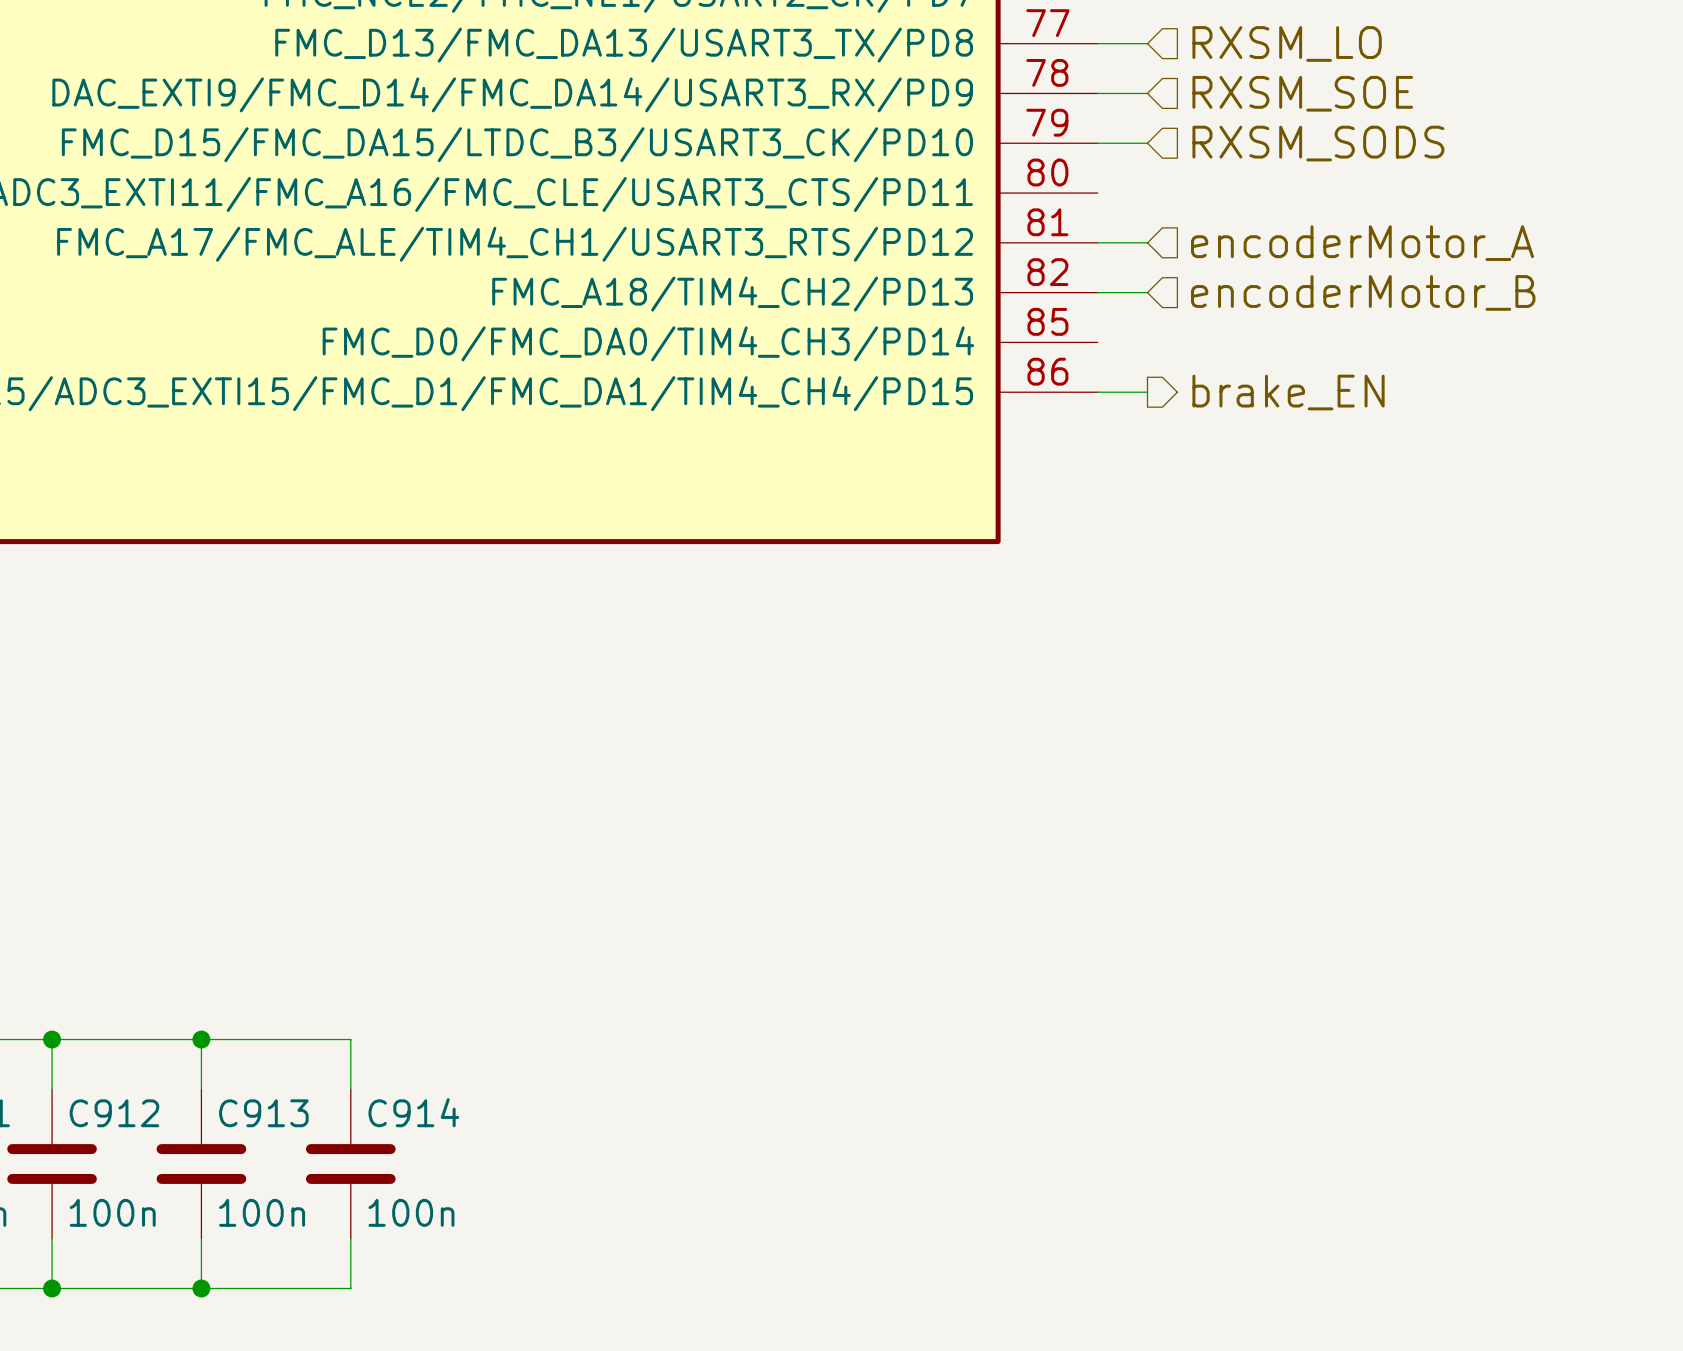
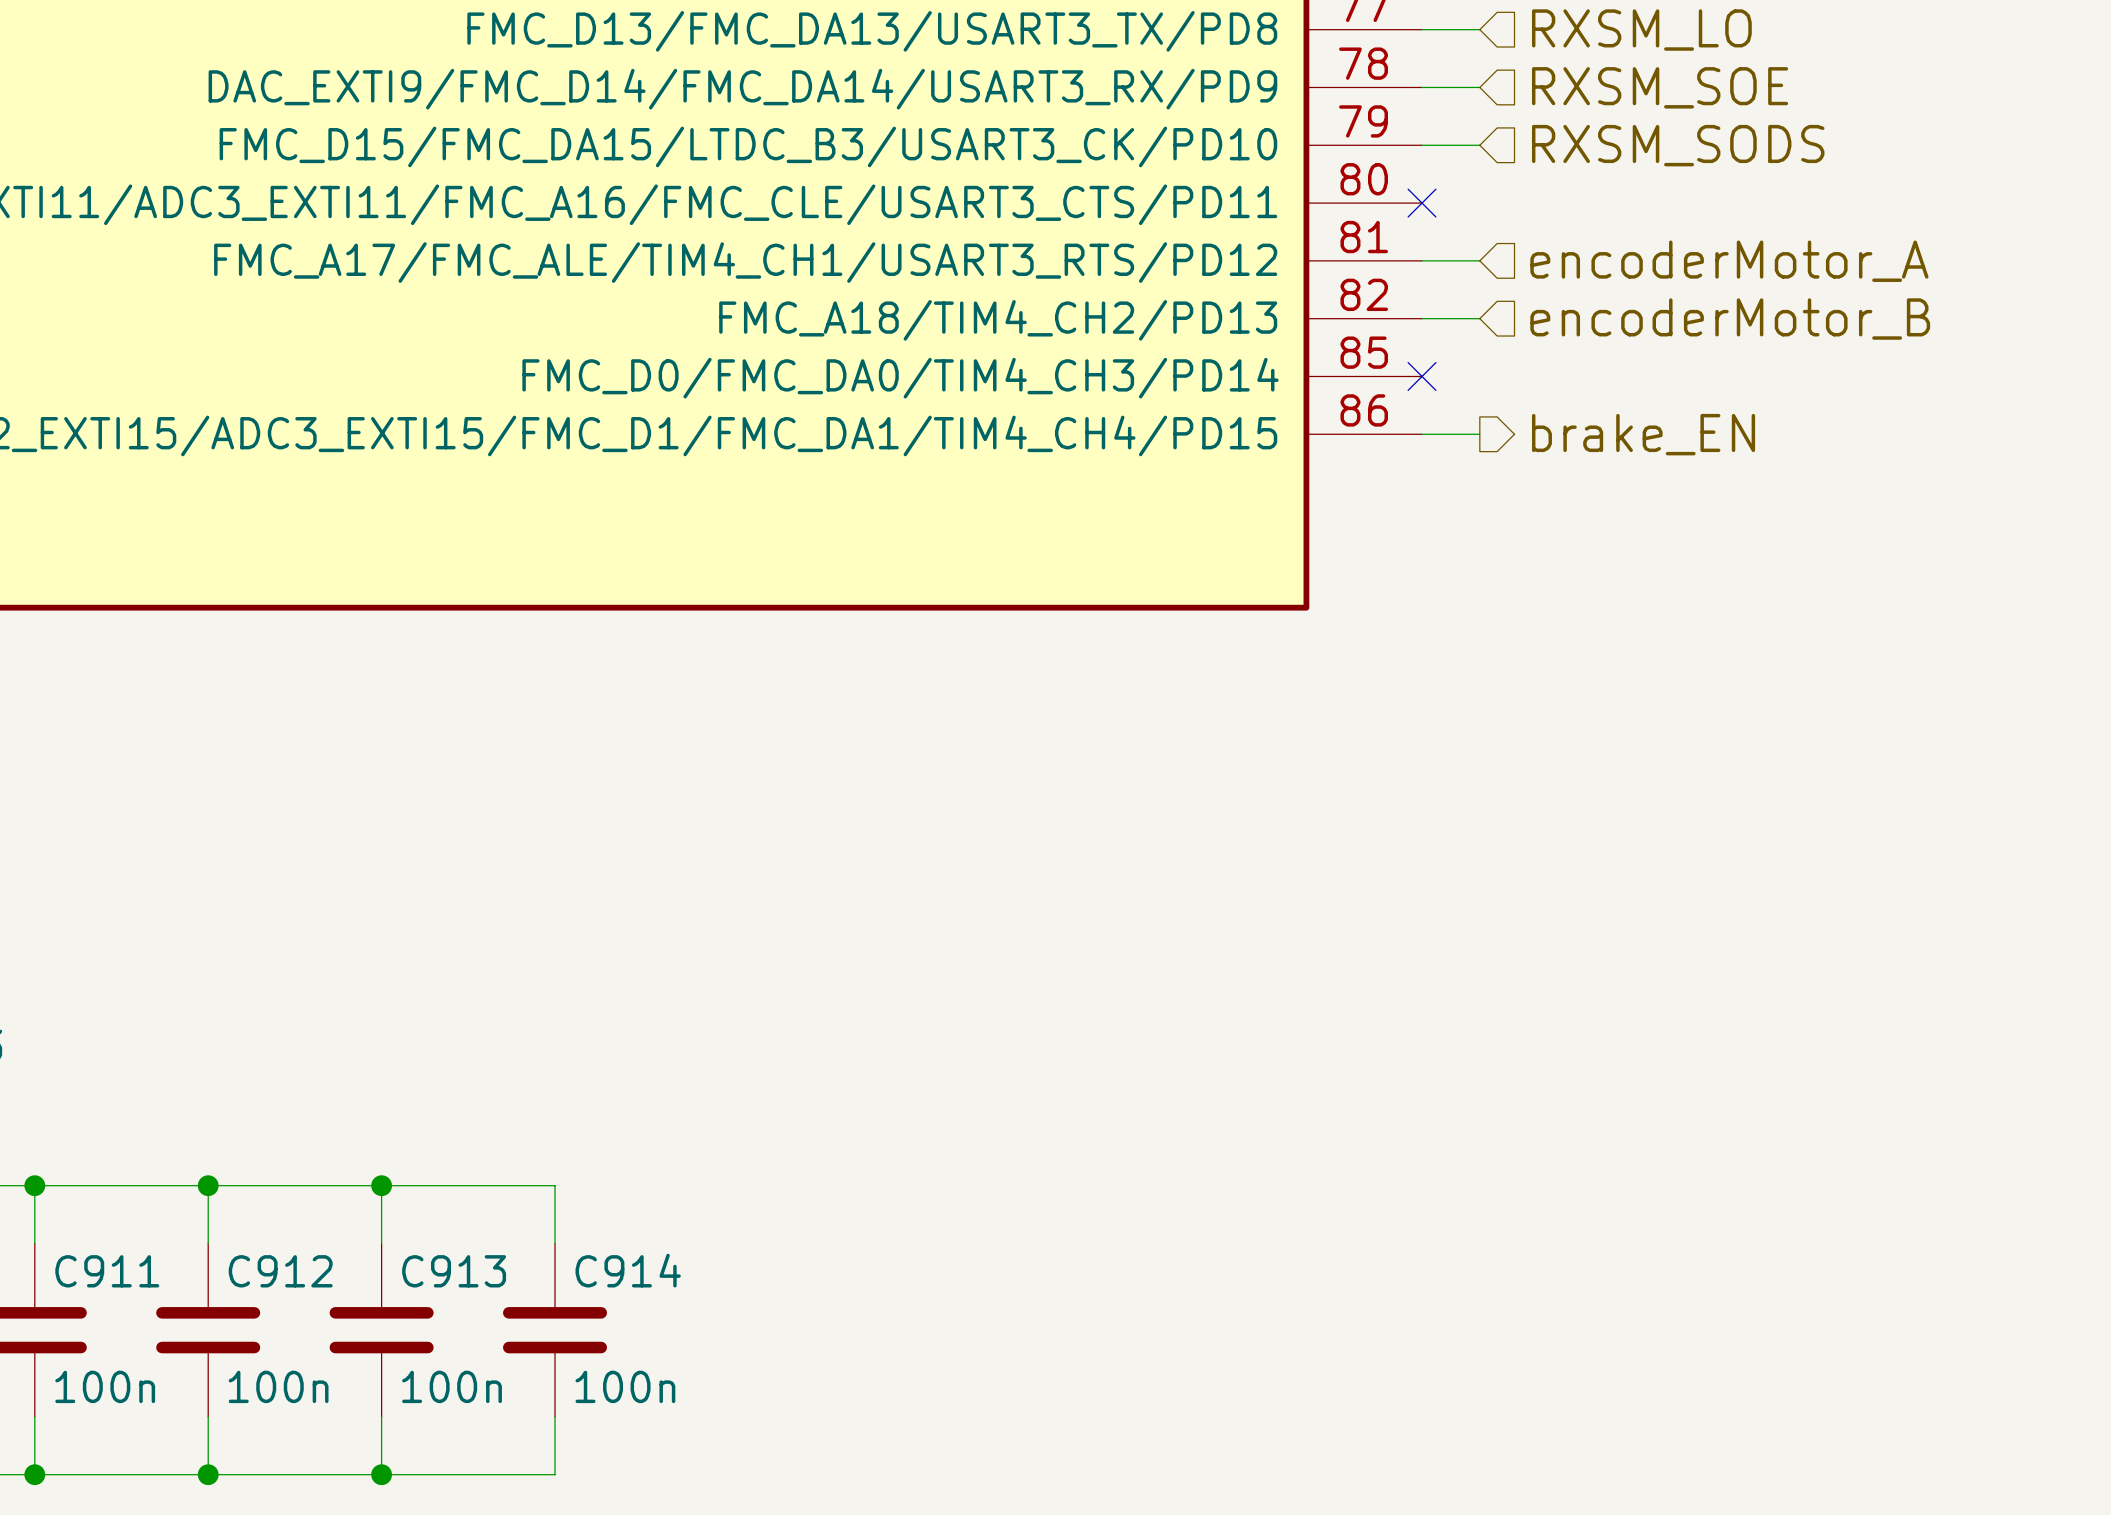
no-connect mark: none -> (1422, 203)
no-connect mark: none -> (1422, 376)

